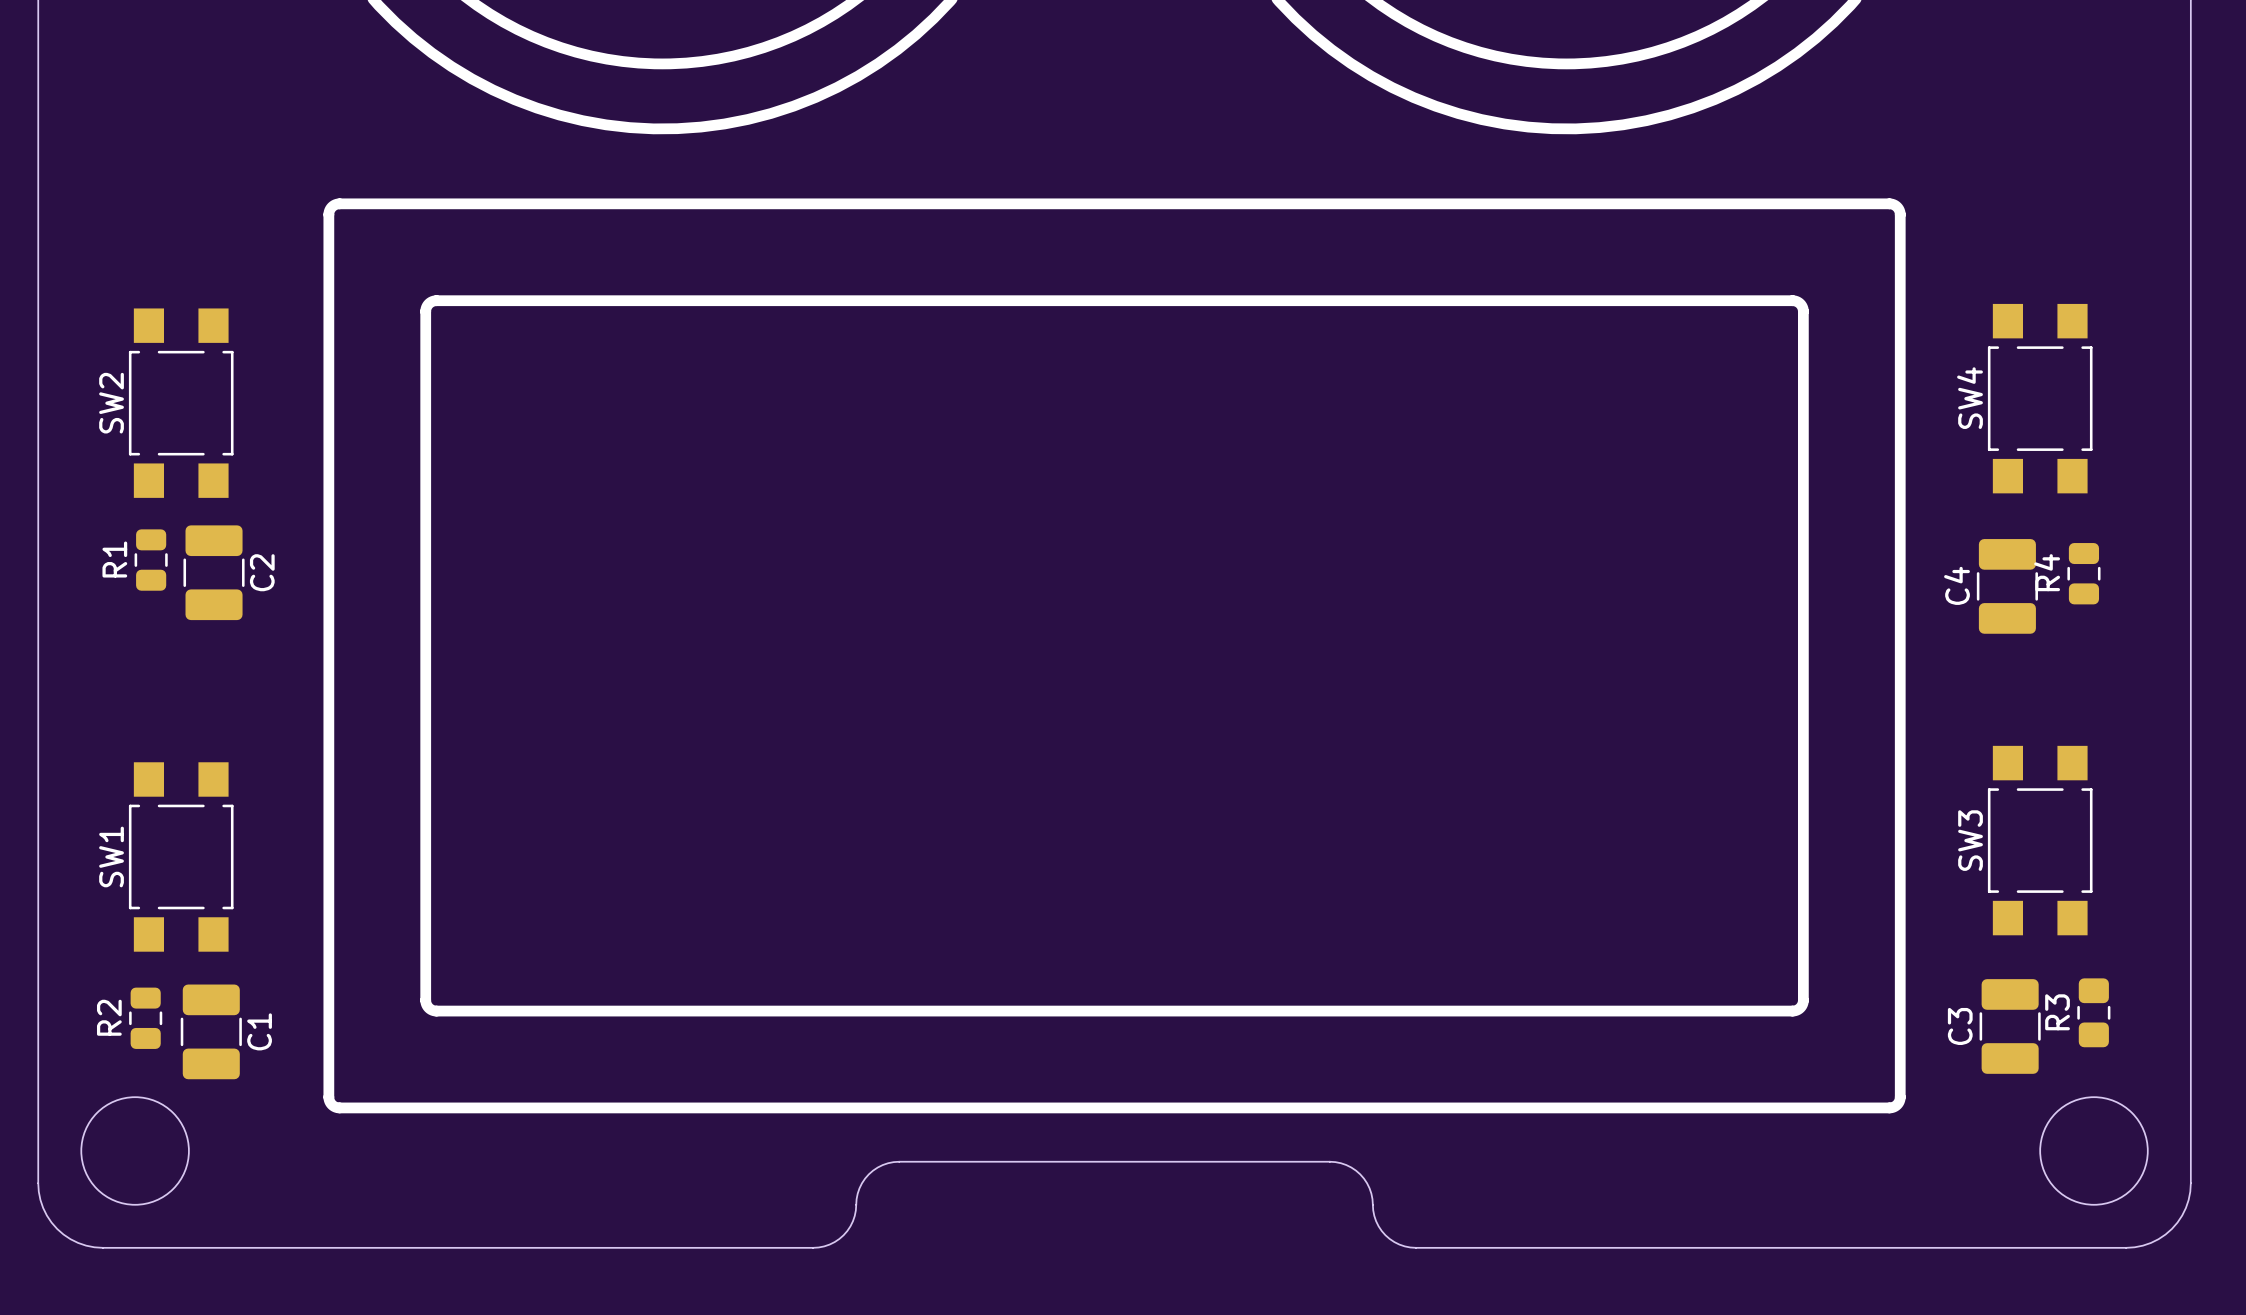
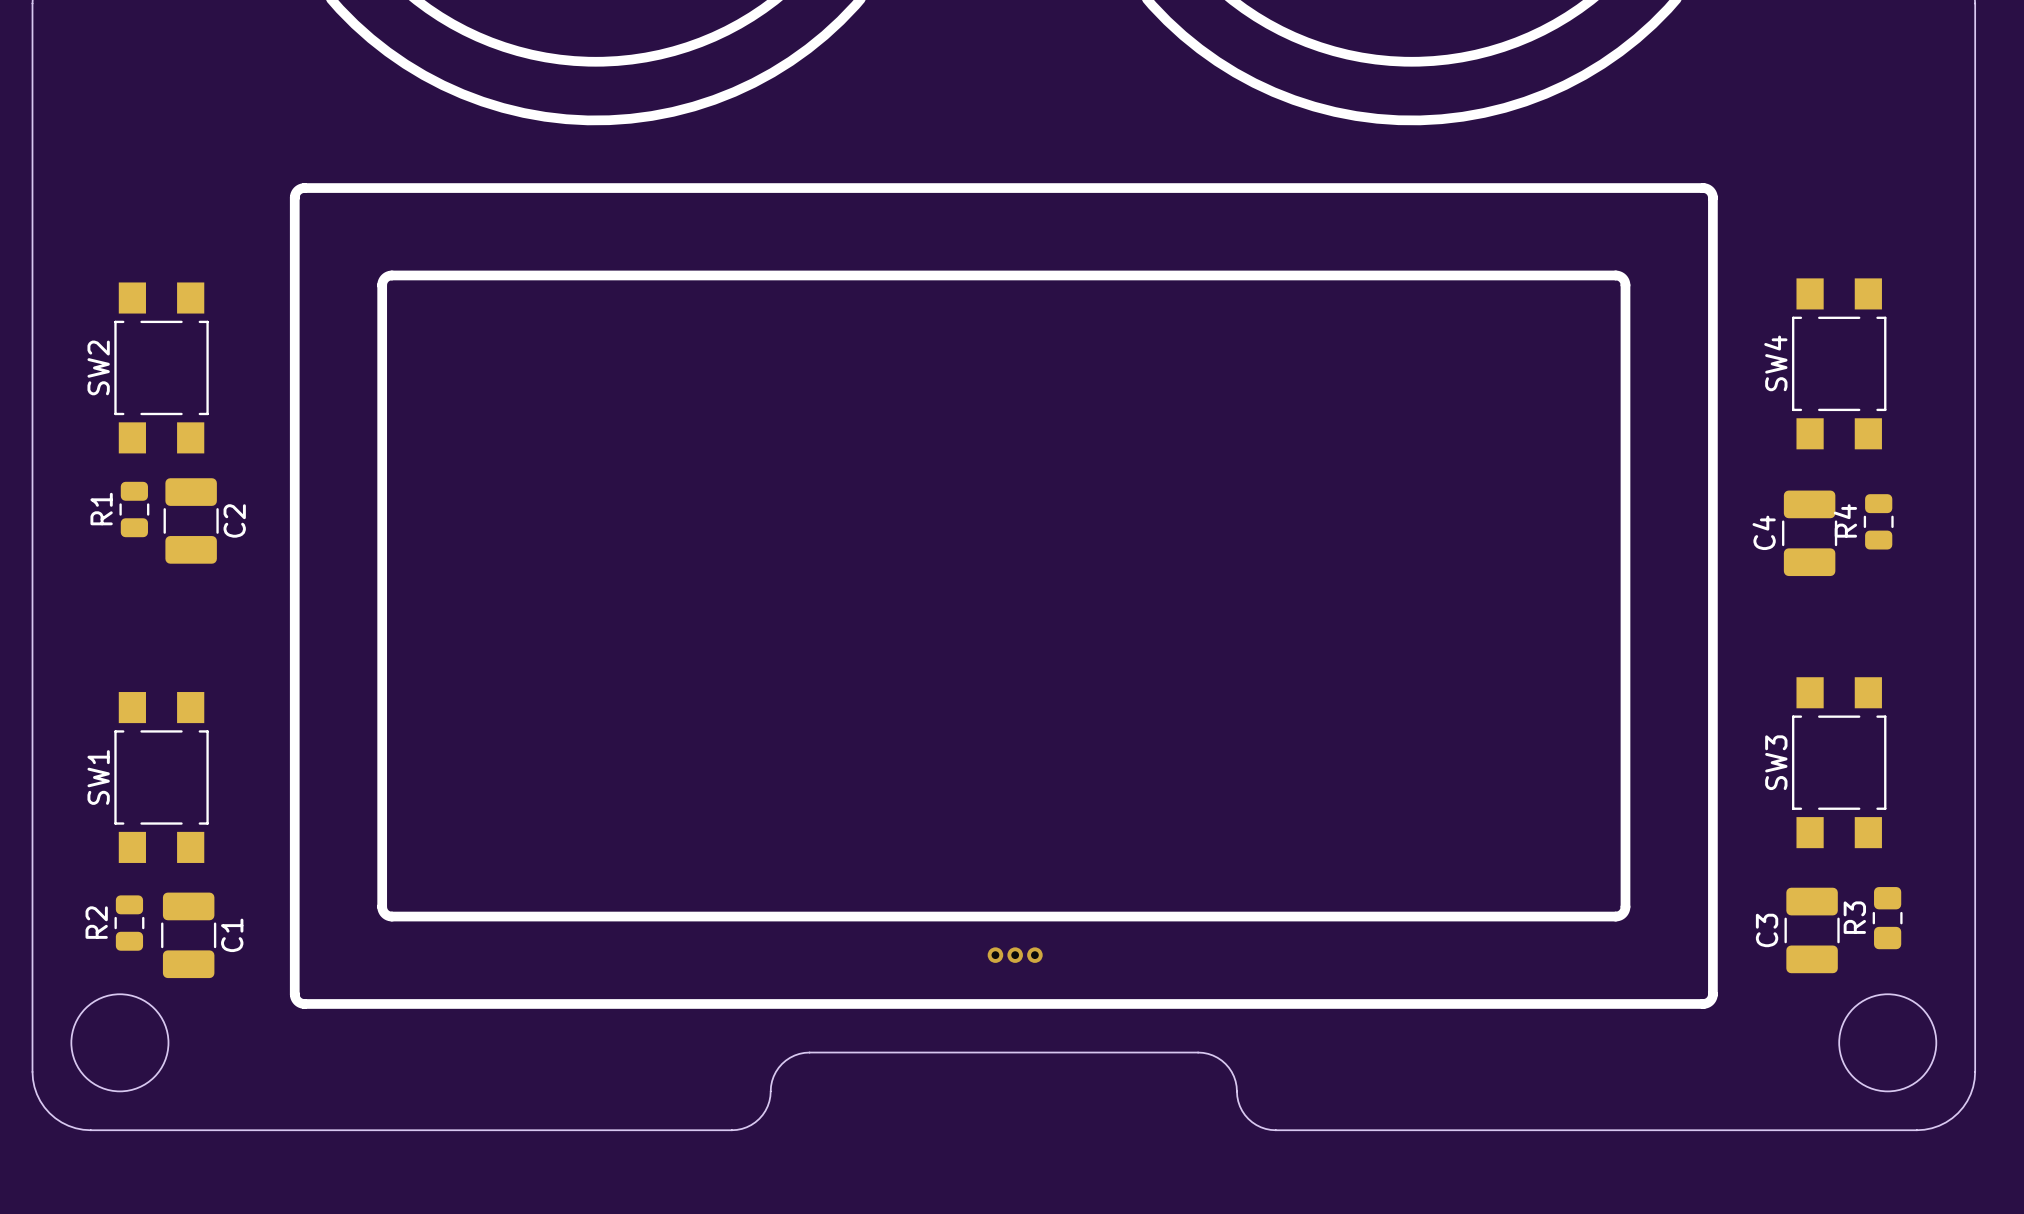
via: none -> (995, 955)
via: none -> (1015, 955)
via: none -> (1034, 955)

